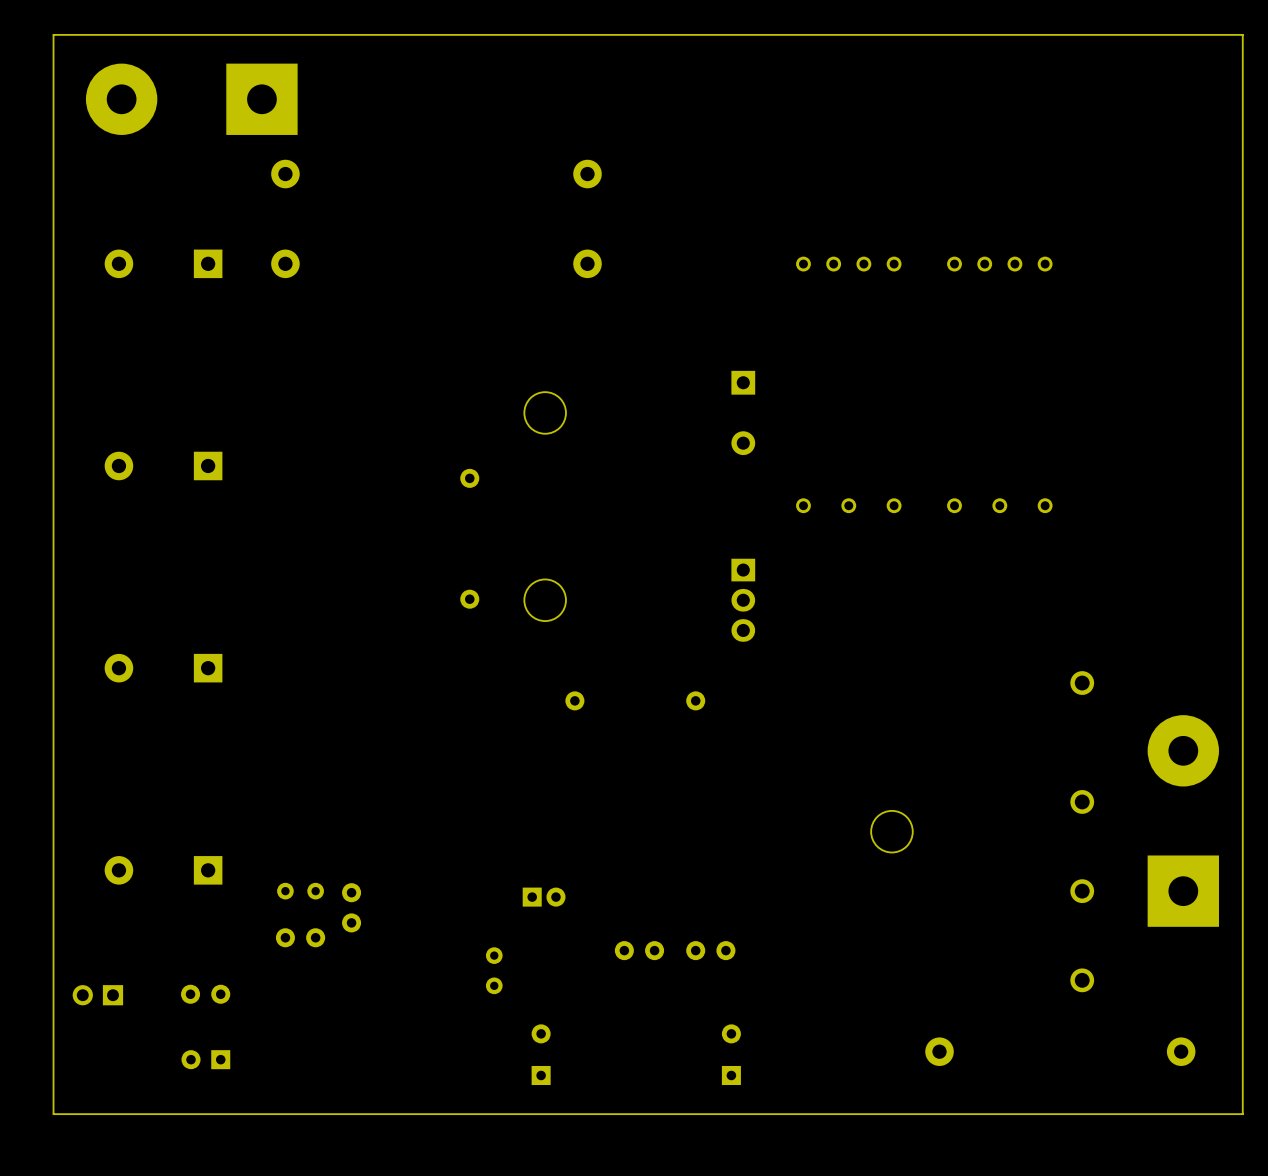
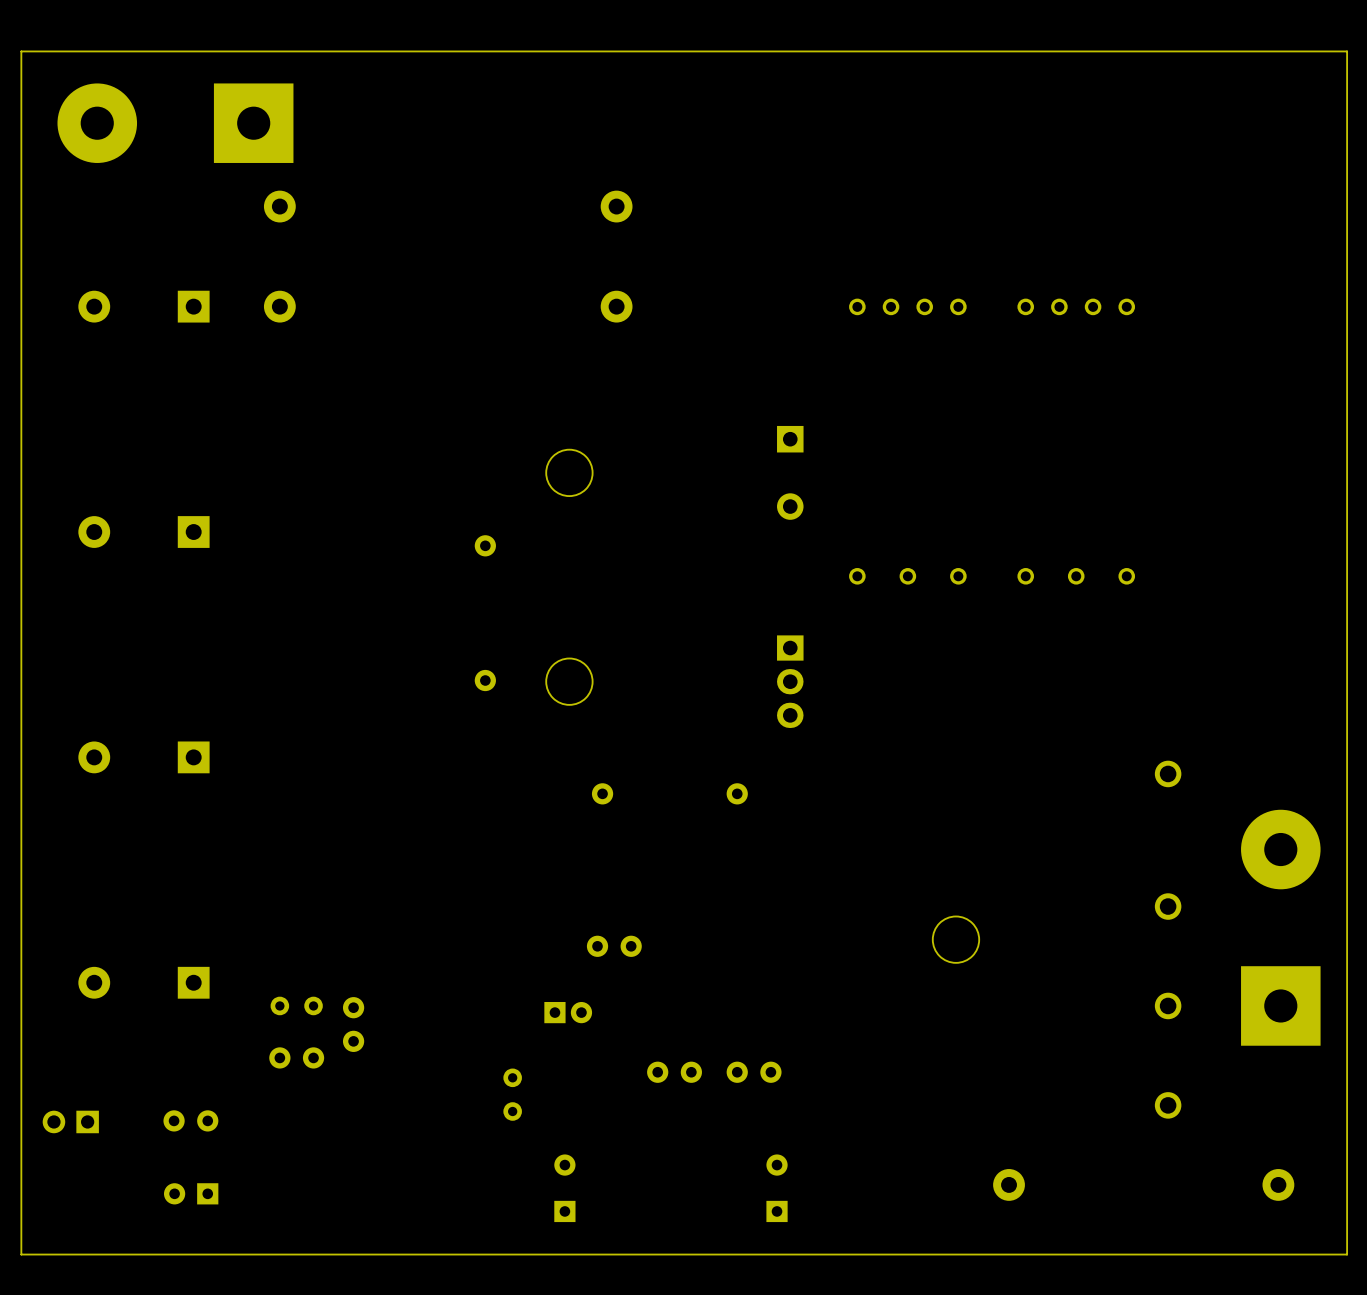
part: none -> (614, 946)

